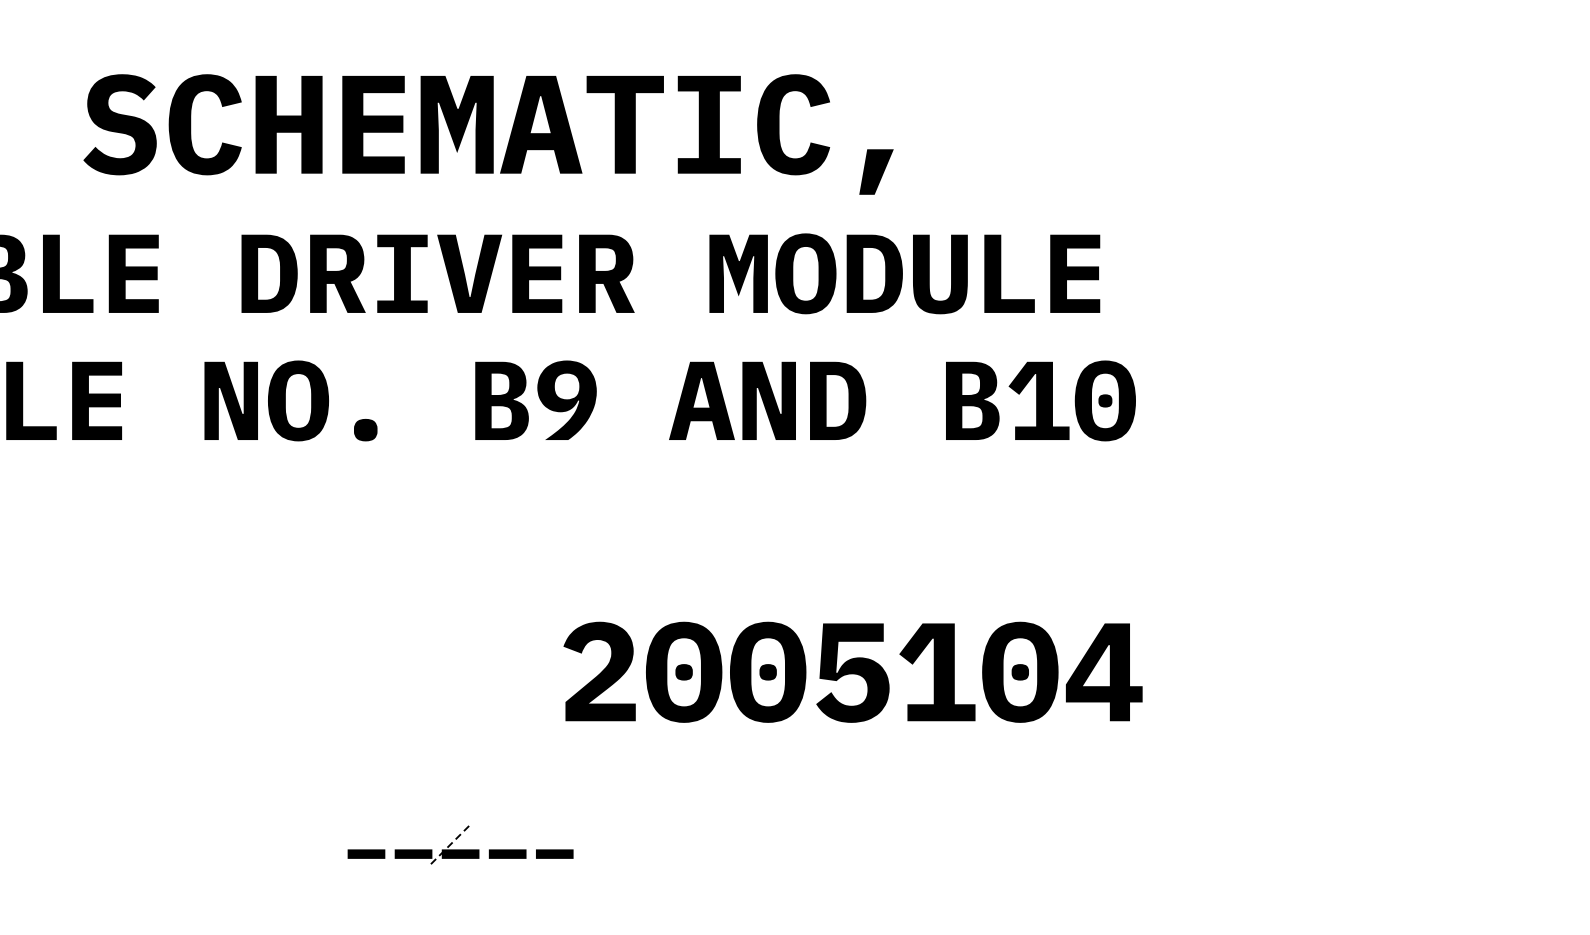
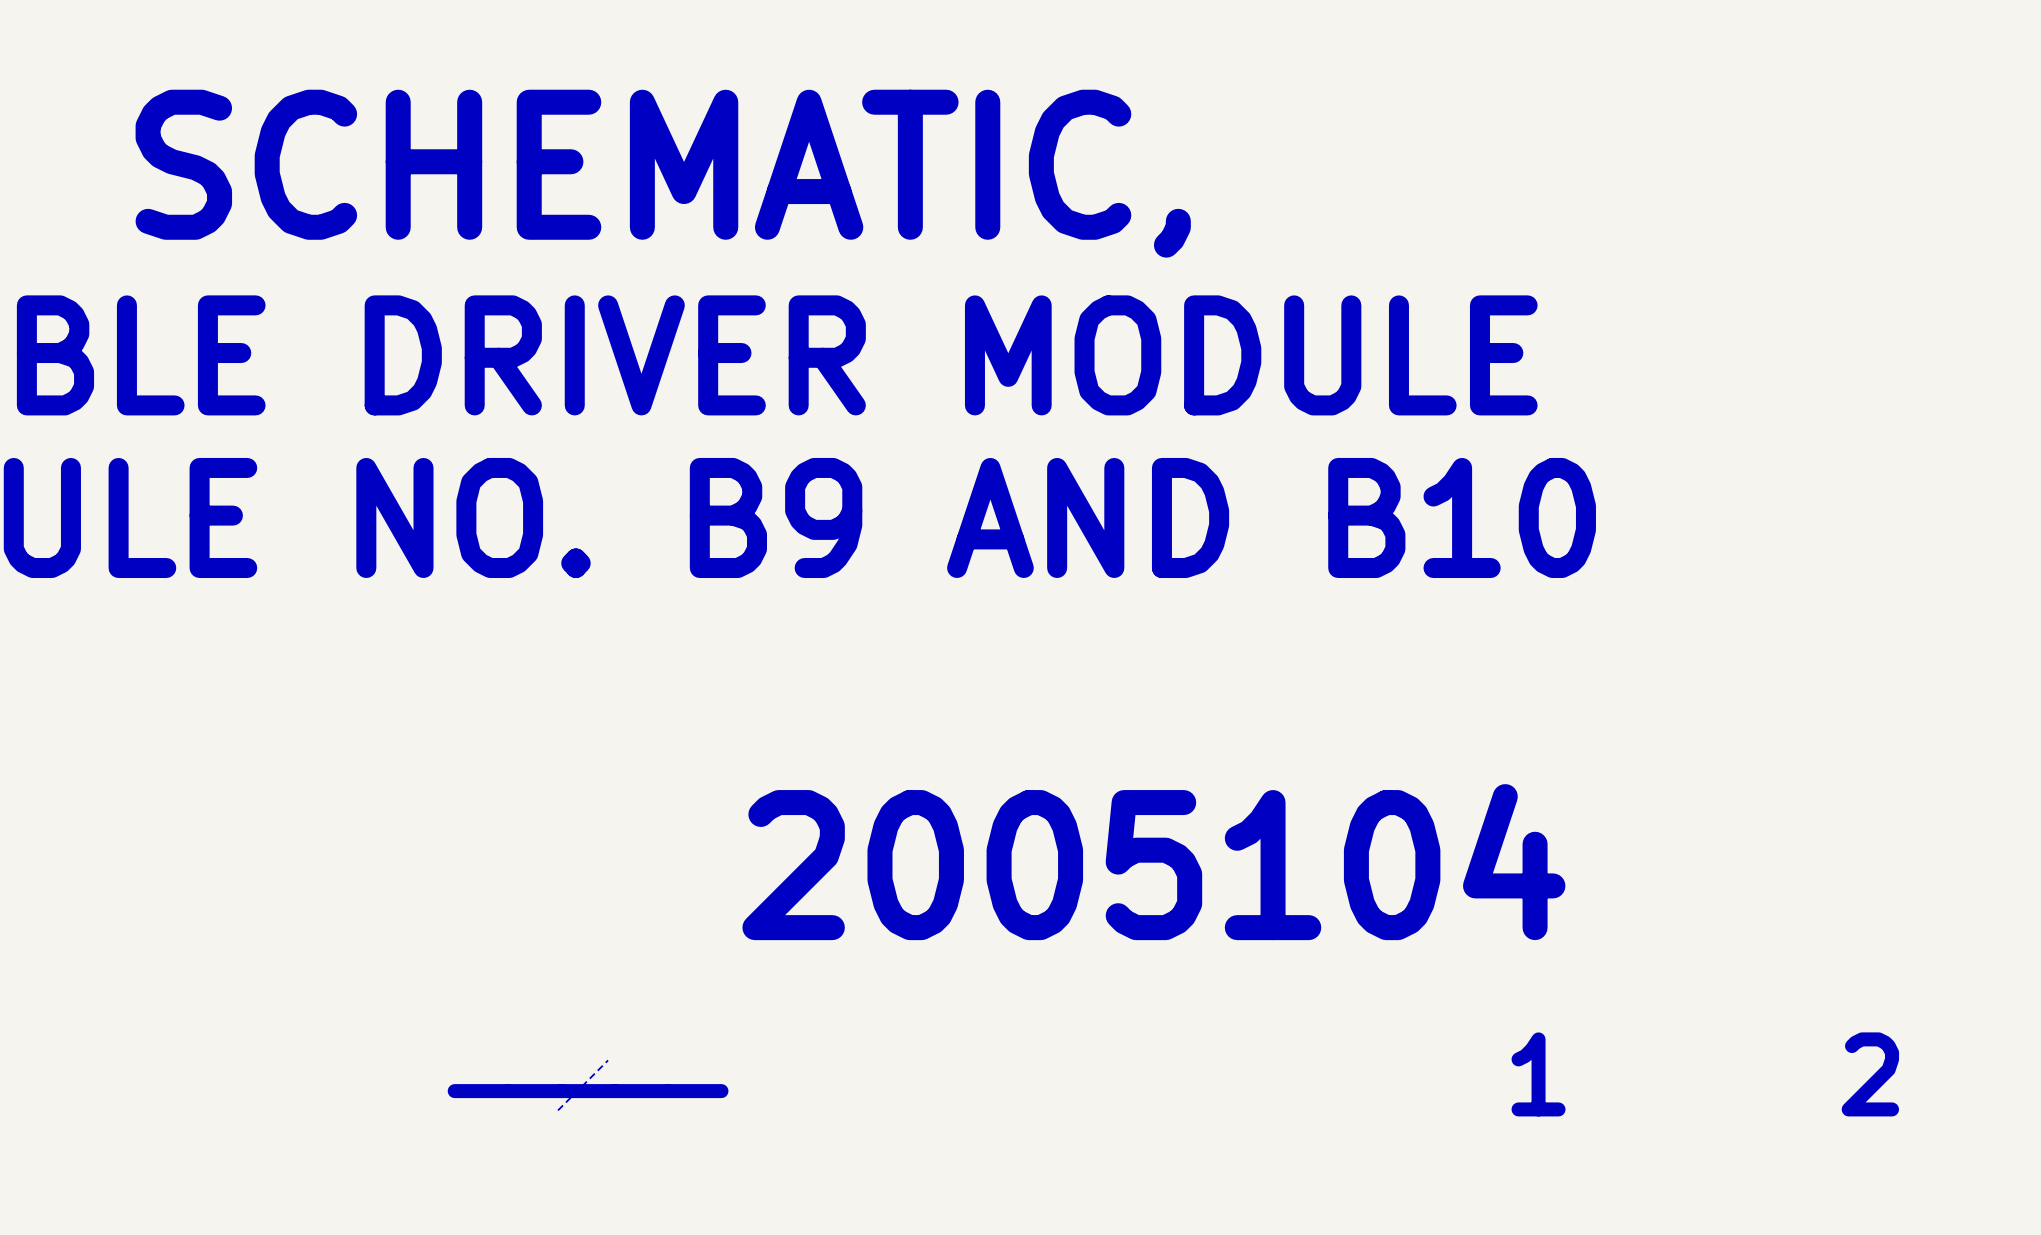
text: none -> 1 2 (1705, 1074)

